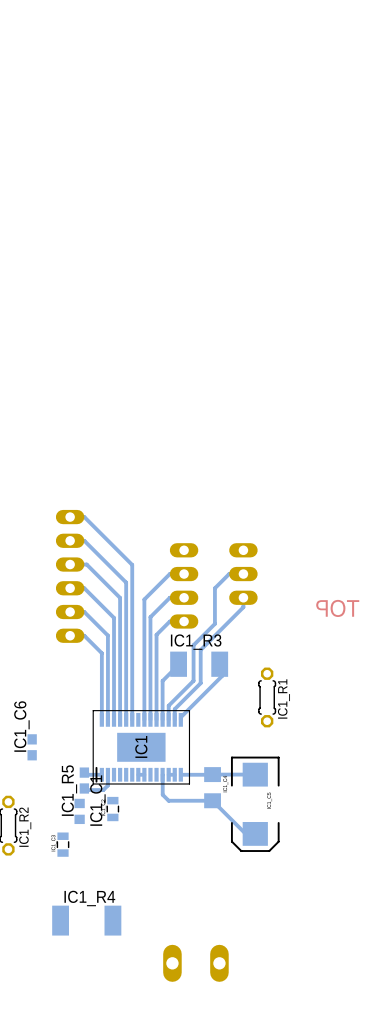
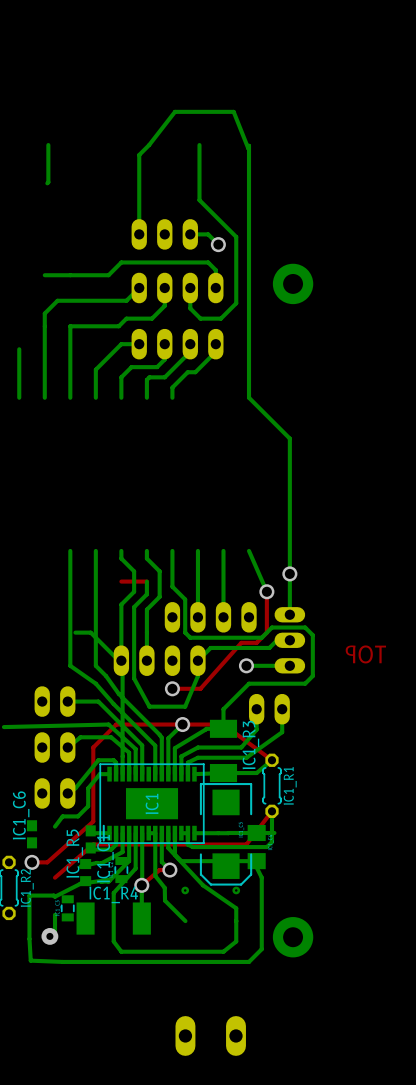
bottom track: none -> (48, 145) (47, 183)
bottom track: none -> (199, 145) (199, 200) (236, 236) (236, 303) (220, 318) (200, 318) (190, 308) (190, 288)
bottom track: none -> (139, 234) (139, 155) (174, 111) (233, 111) (248, 148) (249, 145) (249, 397) (289, 438) (289, 614)
part: none -> (164, 234)
bottom track: none -> (190, 234) (208, 234) (218, 244)
via: none -> (218, 244)
drawing: none -> [272, 263, 314, 305]
bottom track: none -> (44, 275) (108, 275) (121, 262) (208, 262) (215, 270) (215, 288)
bottom track: none -> (139, 288) (126, 300) (57, 300) (44, 313) (44, 397)
bottom track: none -> (164, 288) (164, 305) (152, 318) (126, 318) (118, 326) (70, 326) (70, 397)
part: none -> (177, 288)
bottom track: none -> (139, 344) (121, 344) (95, 369) (95, 397)
bottom track: none -> (164, 344) (164, 359) (157, 367) (131, 367) (121, 377) (121, 397)
part: none -> (177, 344)
bottom track: none -> (190, 344) (190, 351) (164, 377) (149, 377) (146, 379) (146, 397)
bottom track: none -> (215, 344) (215, 351) (195, 372) (187, 372) (172, 387) (172, 397)
bottom track: none -> (19, 349) (19, 397)
bottom track: none -> (121, 550) (121, 558) (134, 571) (134, 591) (121, 604) (121, 660)
bottom track: none -> (146, 550) (146, 558) (159, 571) (159, 596) (146, 609) (146, 660)
bottom track: none -> (197, 550) (197, 617)
bottom track: none -> (223, 550) (223, 617)
bottom track: none -> (249, 550) (266, 591)
bottom track: (70, 517) (84, 517) (132, 564) (132, 693) -> (67, 701) (98, 701) (142, 745)
via: none -> (289, 573)
bottom track: (70, 540) (84, 540) (126, 582) (126, 696) -> (3, 727) (108, 724) (135, 749)
bottom track: none -> (146, 581) (146, 594) (134, 607) (134, 678) (149, 706) (185, 706) (197, 676) (197, 660) (210, 647) (269, 647) (277, 640) (289, 640)
top track: none -> (146, 581) (121, 581)
top track: none -> (266, 591) (266, 632) (256, 642) (241, 642) (200, 688) (172, 688)
via: none -> (266, 591)
bottom track: (70, 564) (86, 564) (120, 597) (120, 699) -> (67, 747) (80, 737) (111, 737) (129, 752)
bottom track: (184, 574) (169, 574) (144, 599) (144, 693) -> (70, 550) (70, 665) (95, 683) (155, 745)
bottom track: (243, 574) (229, 574) (214, 588) (214, 623) (193, 645) (193, 680) (168, 705) -> (256, 709) (256, 729) (241, 747) (197, 747) (181, 756) (181, 758)
part position: (243, 574) -> (289, 640)
part: (70, 576) -> none
part rotation: 0° (184, 585) -> 90° clockwise (210, 617)
bottom track: (184, 597) (169, 597) (150, 617) (150, 685) -> (95, 550) (95, 665) (118, 693) (161, 737)
bottom track: (243, 597) (243, 607) (200, 649) (200, 683) (174, 709) -> (282, 709) (282, 732) (246, 757) (197, 757) (187, 762)
bottom track: (70, 612) (84, 612) (107, 635) (107, 709) -> (67, 793) (75, 788) (98, 760) (113, 760) (116, 762)
part: none -> (159, 660)
via: none -> (246, 665)
bottom track: none -> (289, 665) (246, 665)
bottom track: (184, 621) (169, 621) (156, 634) (156, 686) -> (182, 724) (168, 738)
bottom track: (70, 635) (84, 635) (101, 653) (101, 719) -> (55, 826) (62, 816) (77, 816) (88, 806) (88, 788) (99, 774) (109, 774)
via: none -> (172, 688)
part: none -> (55, 701)
part: none -> (269, 709)
bottom track: (178, 664) (162, 680) (162, 695) -> (172, 550) (172, 586) (185, 599) (185, 632) (190, 637) (261, 637) (271, 627) (305, 627) (312, 635) (312, 676) (305, 683) (249, 683) (223, 709) (223, 728) (206, 728) (174, 748)
IC1_R3 rotation: 0° (199, 664) -> 90° clockwise (223, 750)
IC1_R3 position: (199, 664) -> (223, 750)
bottom track: (219, 664) (222, 666) (222, 676) (180, 717) (180, 719) -> (271, 760) (256, 773) (194, 774)
via: none -> (182, 724)
part: none -> (55, 747)
IC1_R1 position: (267, 697) -> (271, 785)
top track: none -> (271, 760) (223, 724) (116, 724) (93, 747) (93, 821) (47, 862) (32, 862)
part: none -> (55, 793)
IC1_C6 position: (32, 747) -> (32, 834)
bottom track: none -> (271, 811) (271, 841) (266, 847) (192, 847) (187, 844) (187, 833)
top track: none -> (271, 811) (246, 844) (93, 844) (55, 877)
bottom track: none -> (122, 833) (122, 852) (100, 863) (80, 866)
bottom track: none -> (142, 833) (142, 920)
bottom track: none -> (155, 833) (155, 875) (164, 887) (165, 900) (185, 921)
bottom track: none -> (161, 833) (161, 861) (169, 870)
bottom track: none -> (168, 833) (168, 848) (203, 885) (236, 908) (236, 941) (223, 951) (121, 951) (113, 941) (113, 893) (135, 868) (135, 833)
part position: (212, 787) -> (256, 847)
bottom track: (212, 800) (245, 833) (255, 833) -> (228, 861) (256, 861) (254, 862) (261, 877) (261, 949) (249, 961) (30, 960) (29, 895) (55, 896) (81, 883) (110, 879) (100, 881) (108, 881) (129, 861) (129, 833)
via: none -> (32, 862)
part position: (255, 804) -> (226, 834)
top track: none -> (169, 870) (159, 870) (141, 885)
via: none -> (169, 870)
via: none -> (141, 885)
drawing: none -> [181, 886, 190, 895]
drawing: none -> [232, 886, 241, 895]
bottom track: none -> (55, 914) (55, 931) (49, 936)
drawing: none -> [272, 917, 314, 958]
via: none -> (49, 936)
IC1_R4 position: (86, 920) -> (113, 918)

